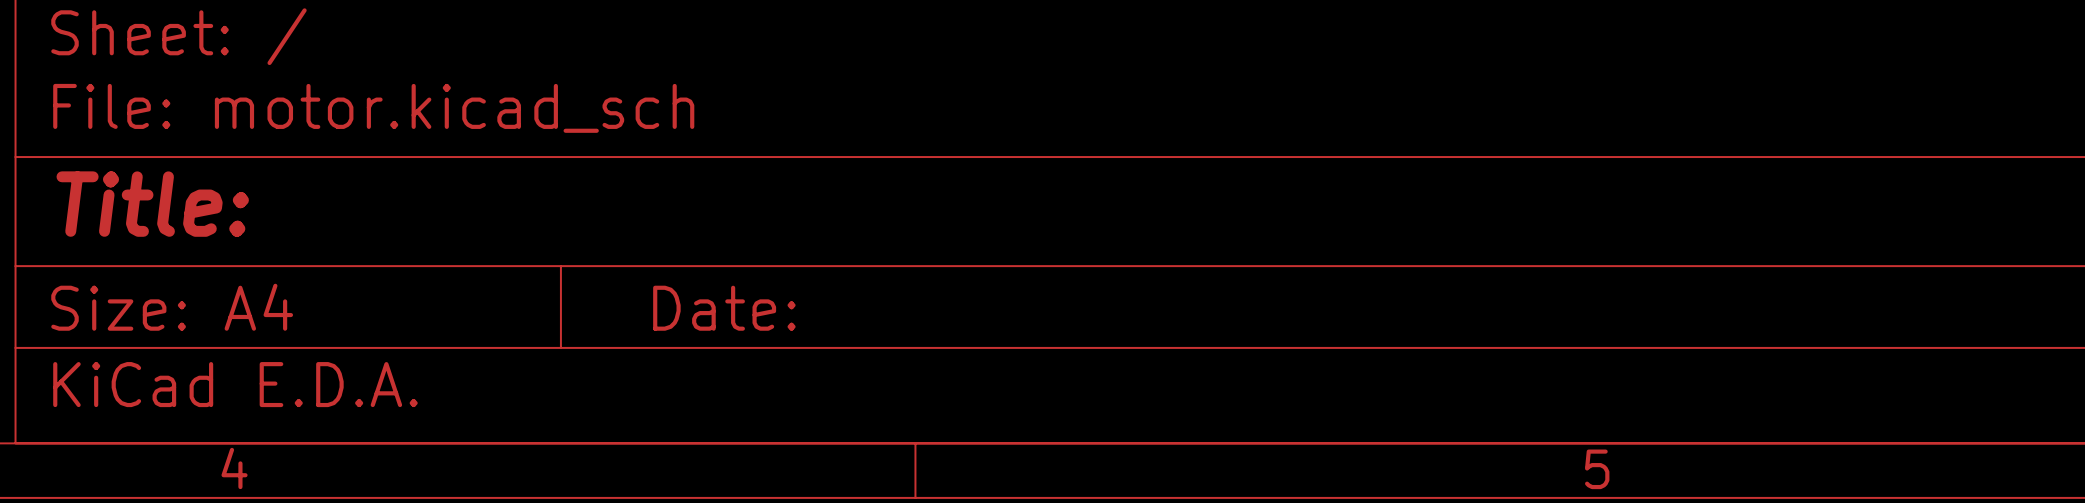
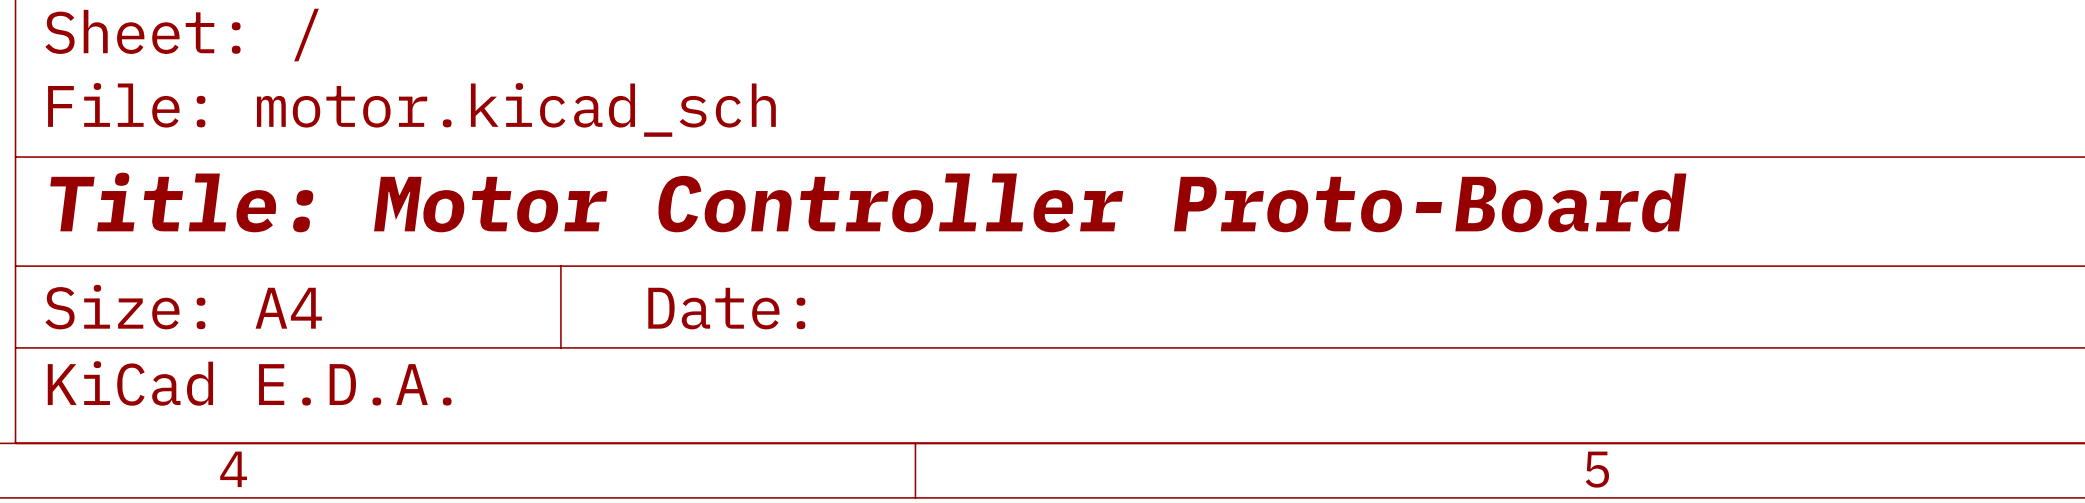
title block: Title: (152, 204) -> Title: Motor Controller Proto-Board (868, 202)

